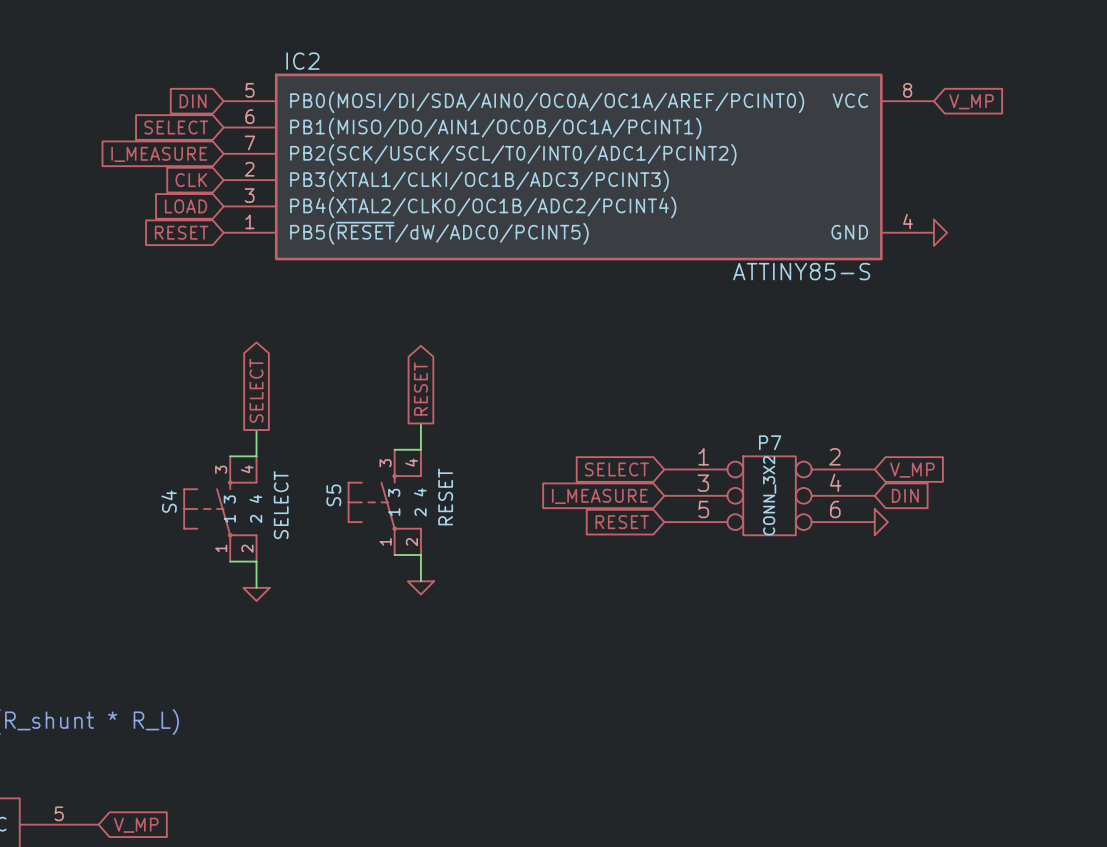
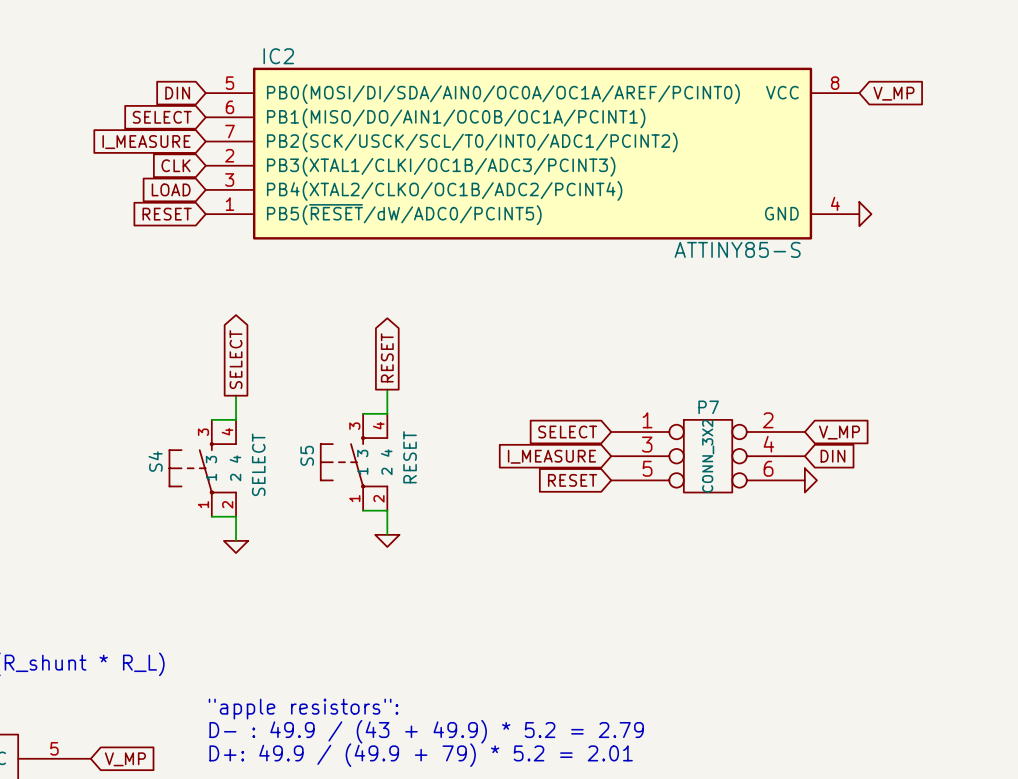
text: none -> "apple resistors": (303, 709)
text: none -> D- : 49.9 / (43 + 49.9) * 5.2 = 2.79 (426, 731)
text: none -> D+: 49.9 / (49.9 + 79) * 5.2 = 2.01 (421, 755)

